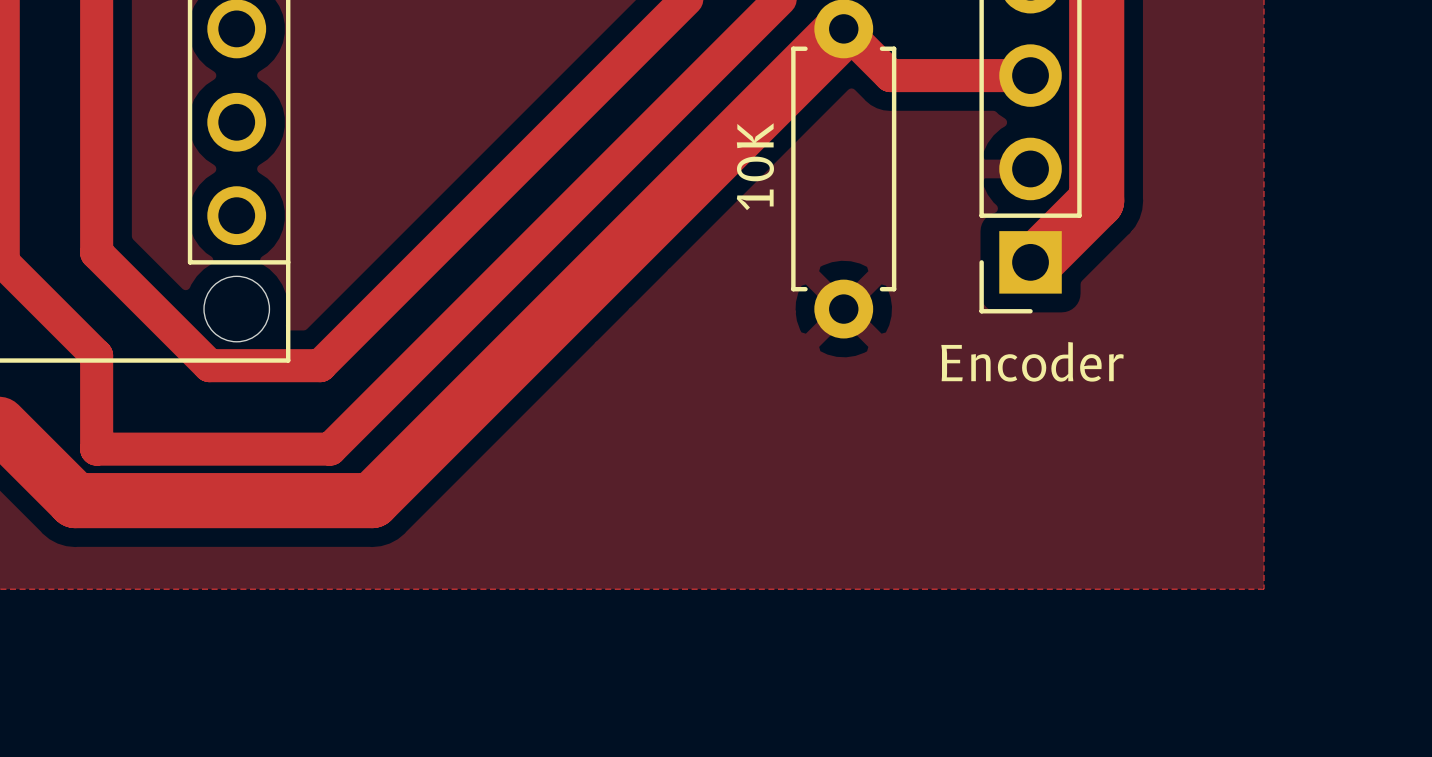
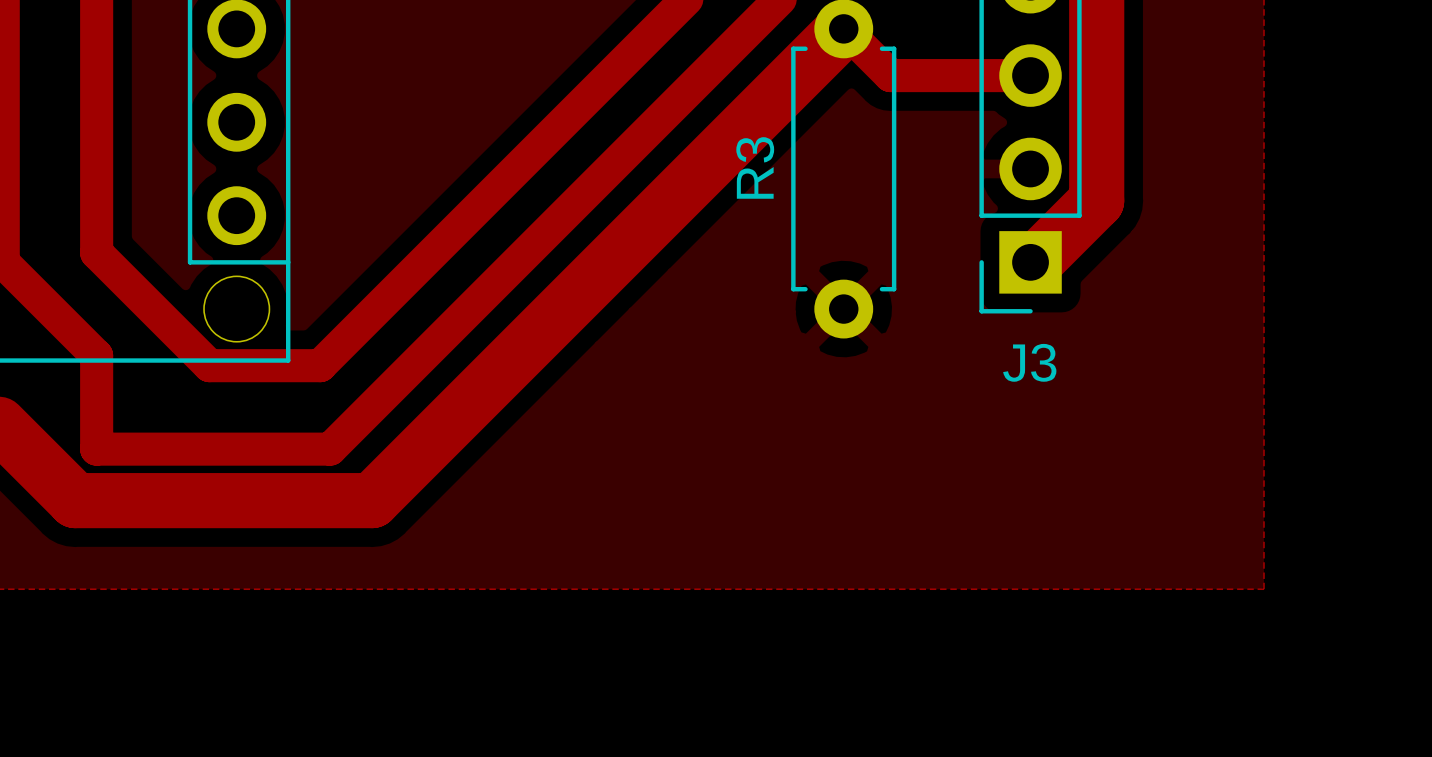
10K name: 10K (755, 166) -> R3 (755, 167)
Encoder name: Encoder (1032, 361) -> J3 (1029, 362)

